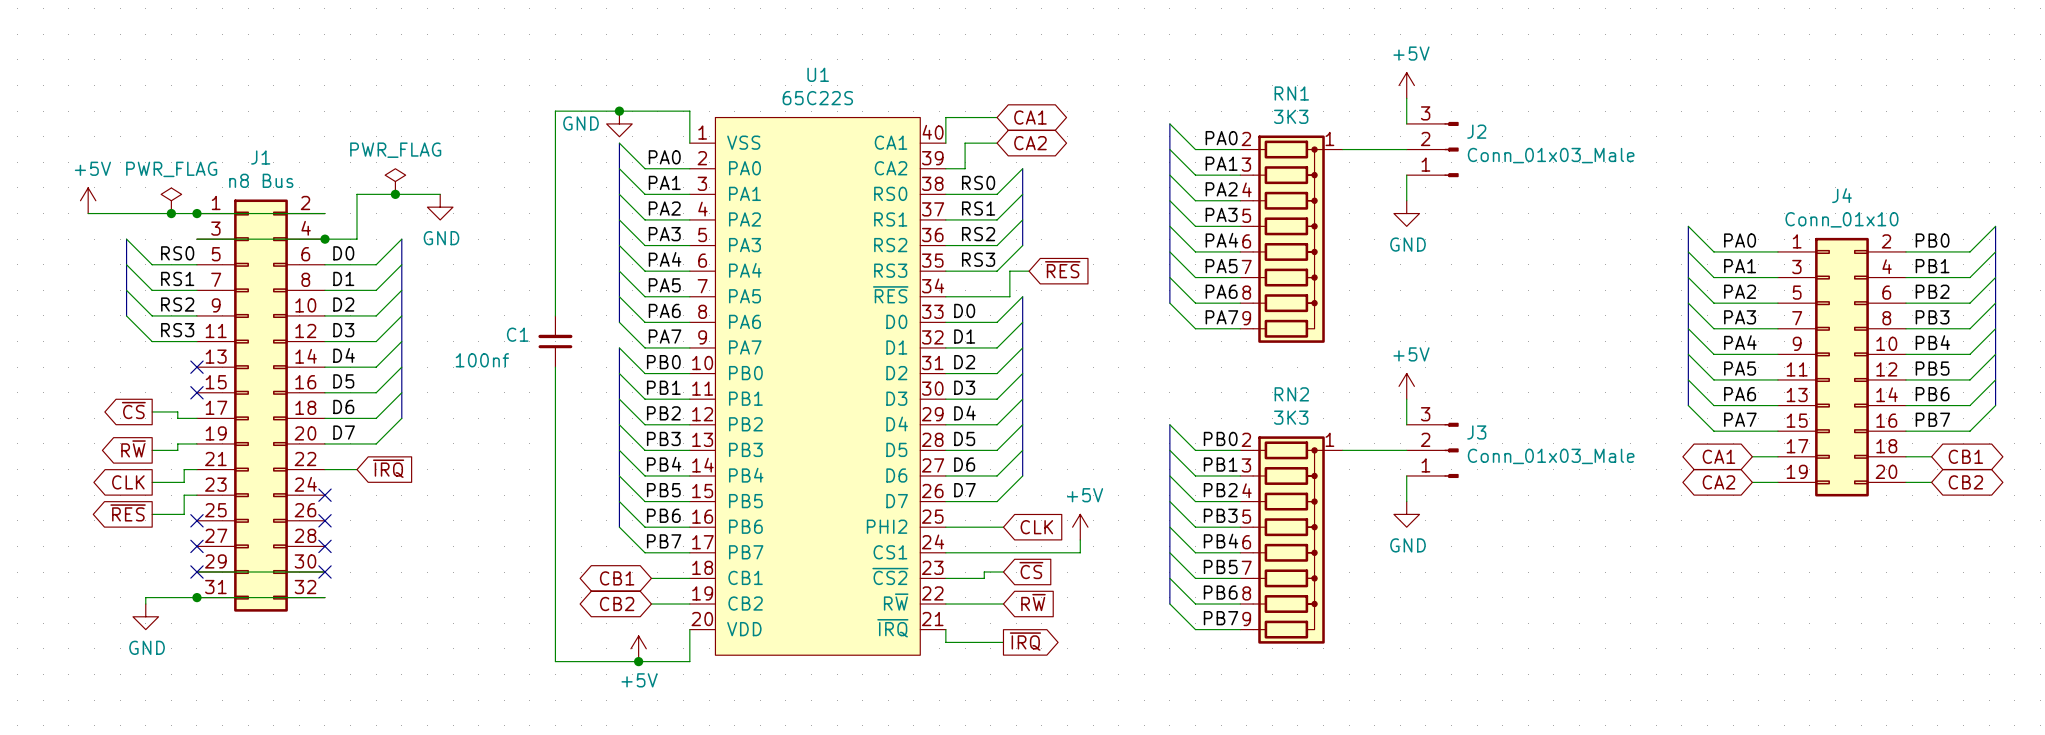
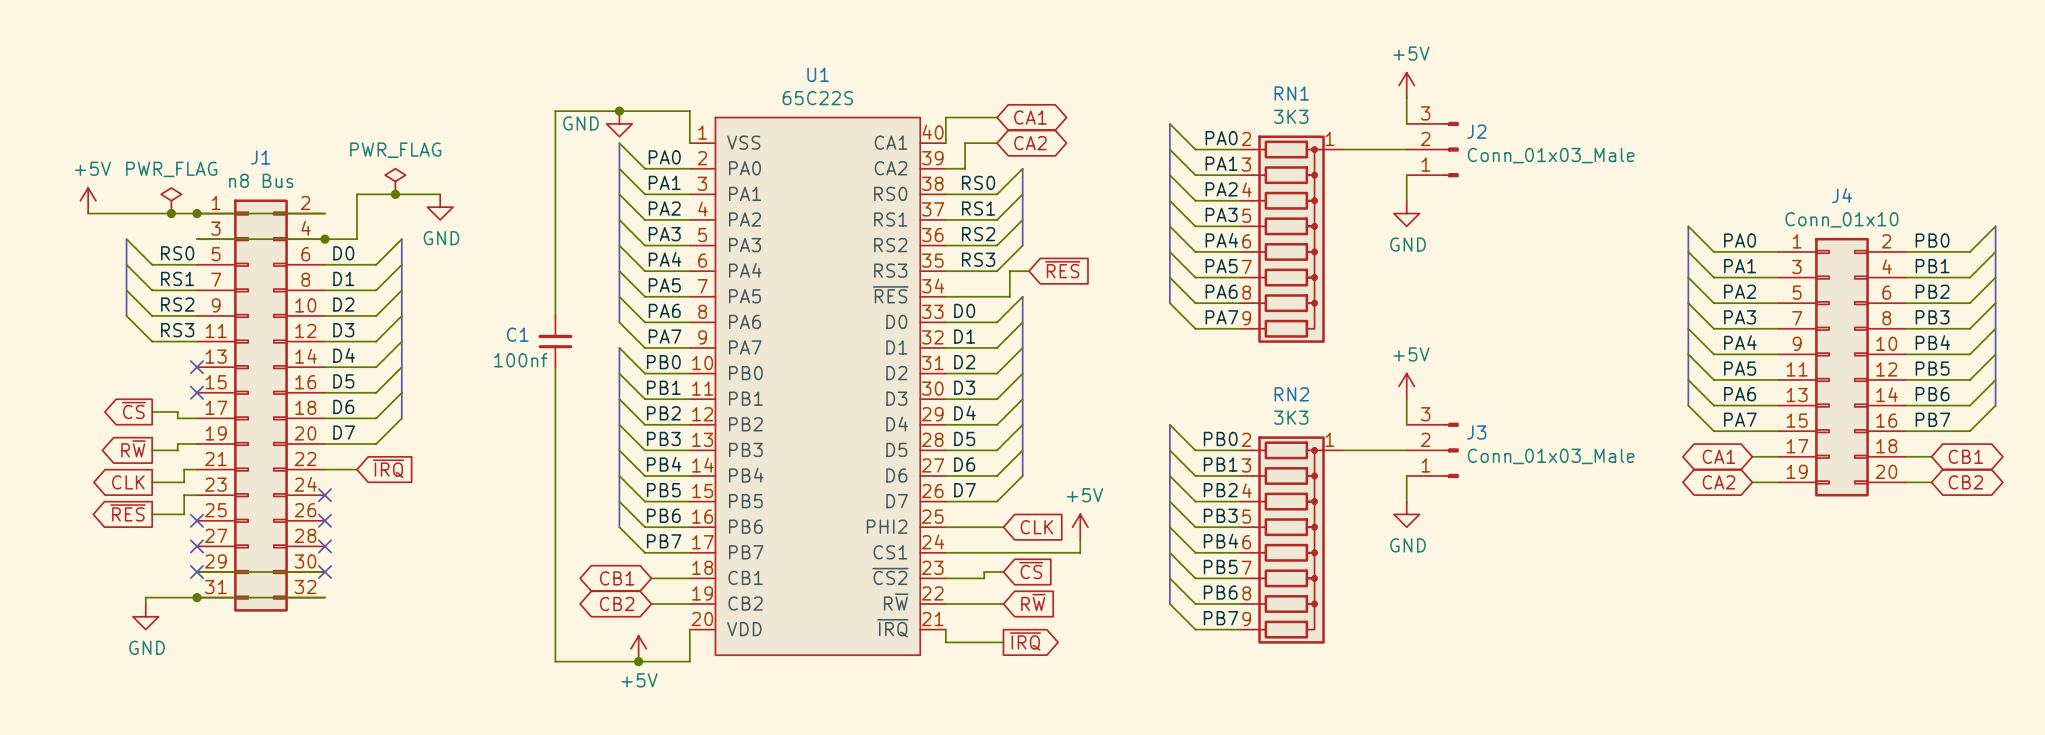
C1 value position: 100nf (482, 360) -> 100nf (520, 360)

